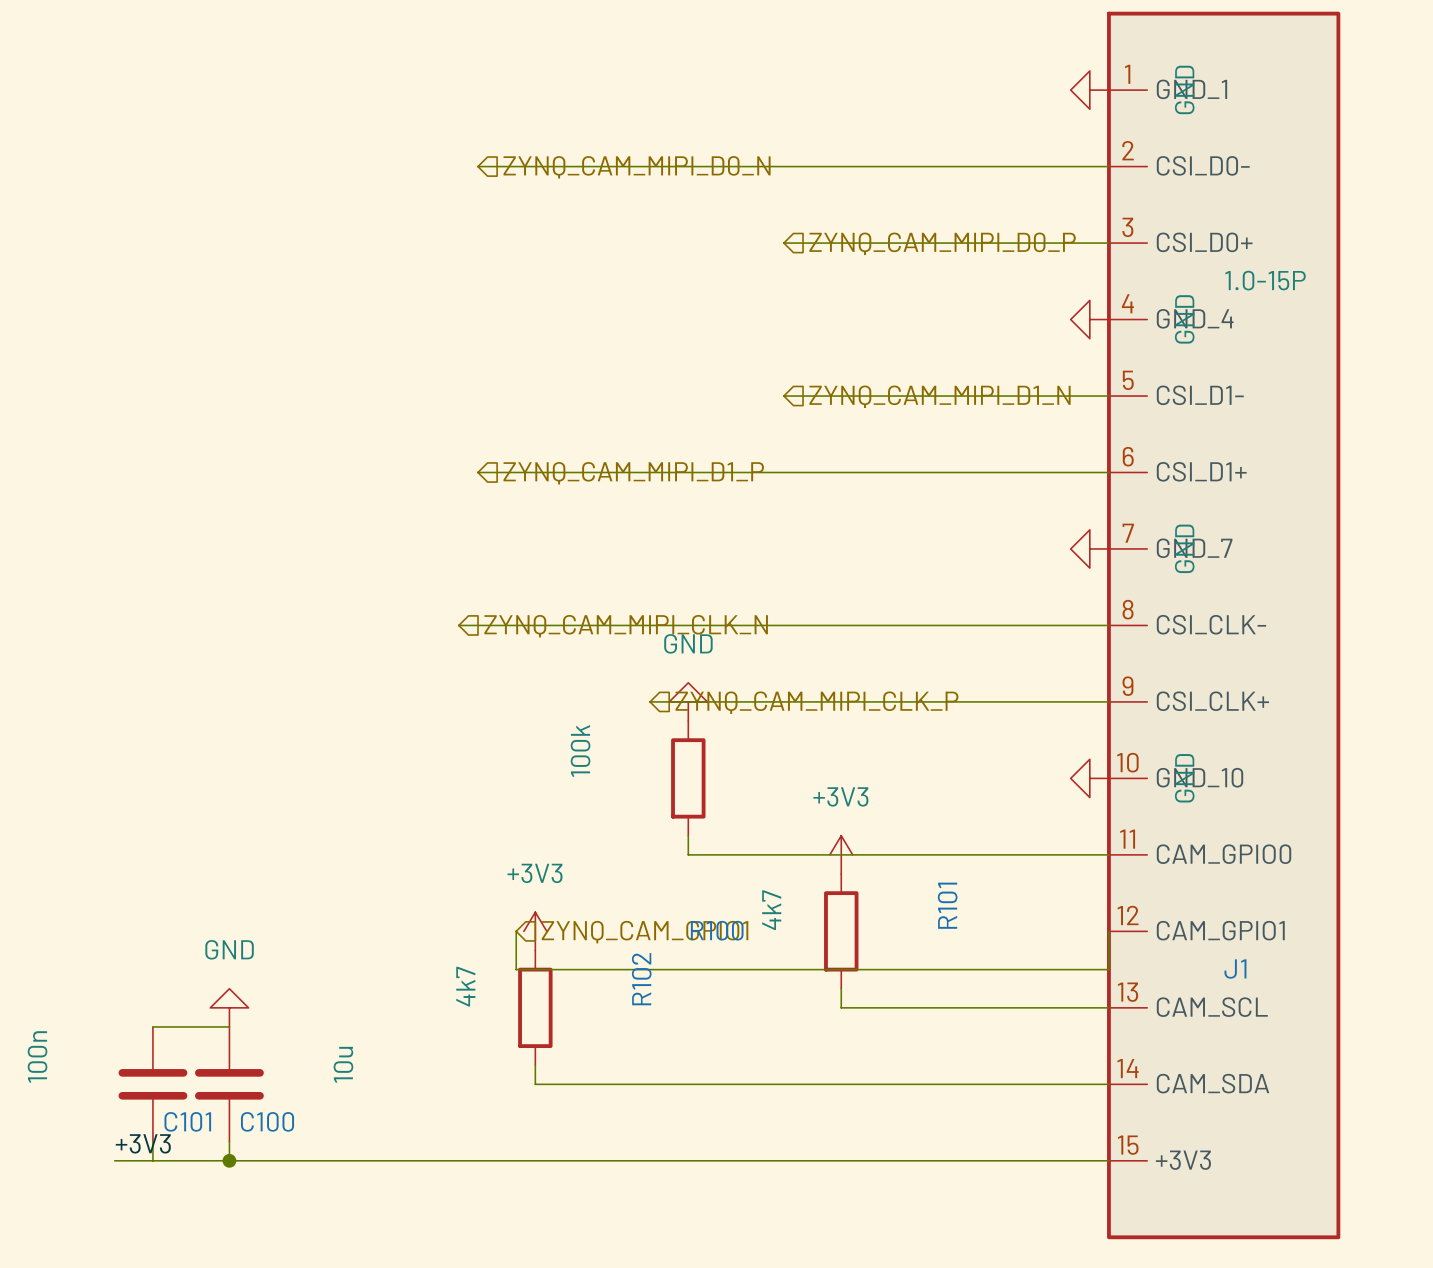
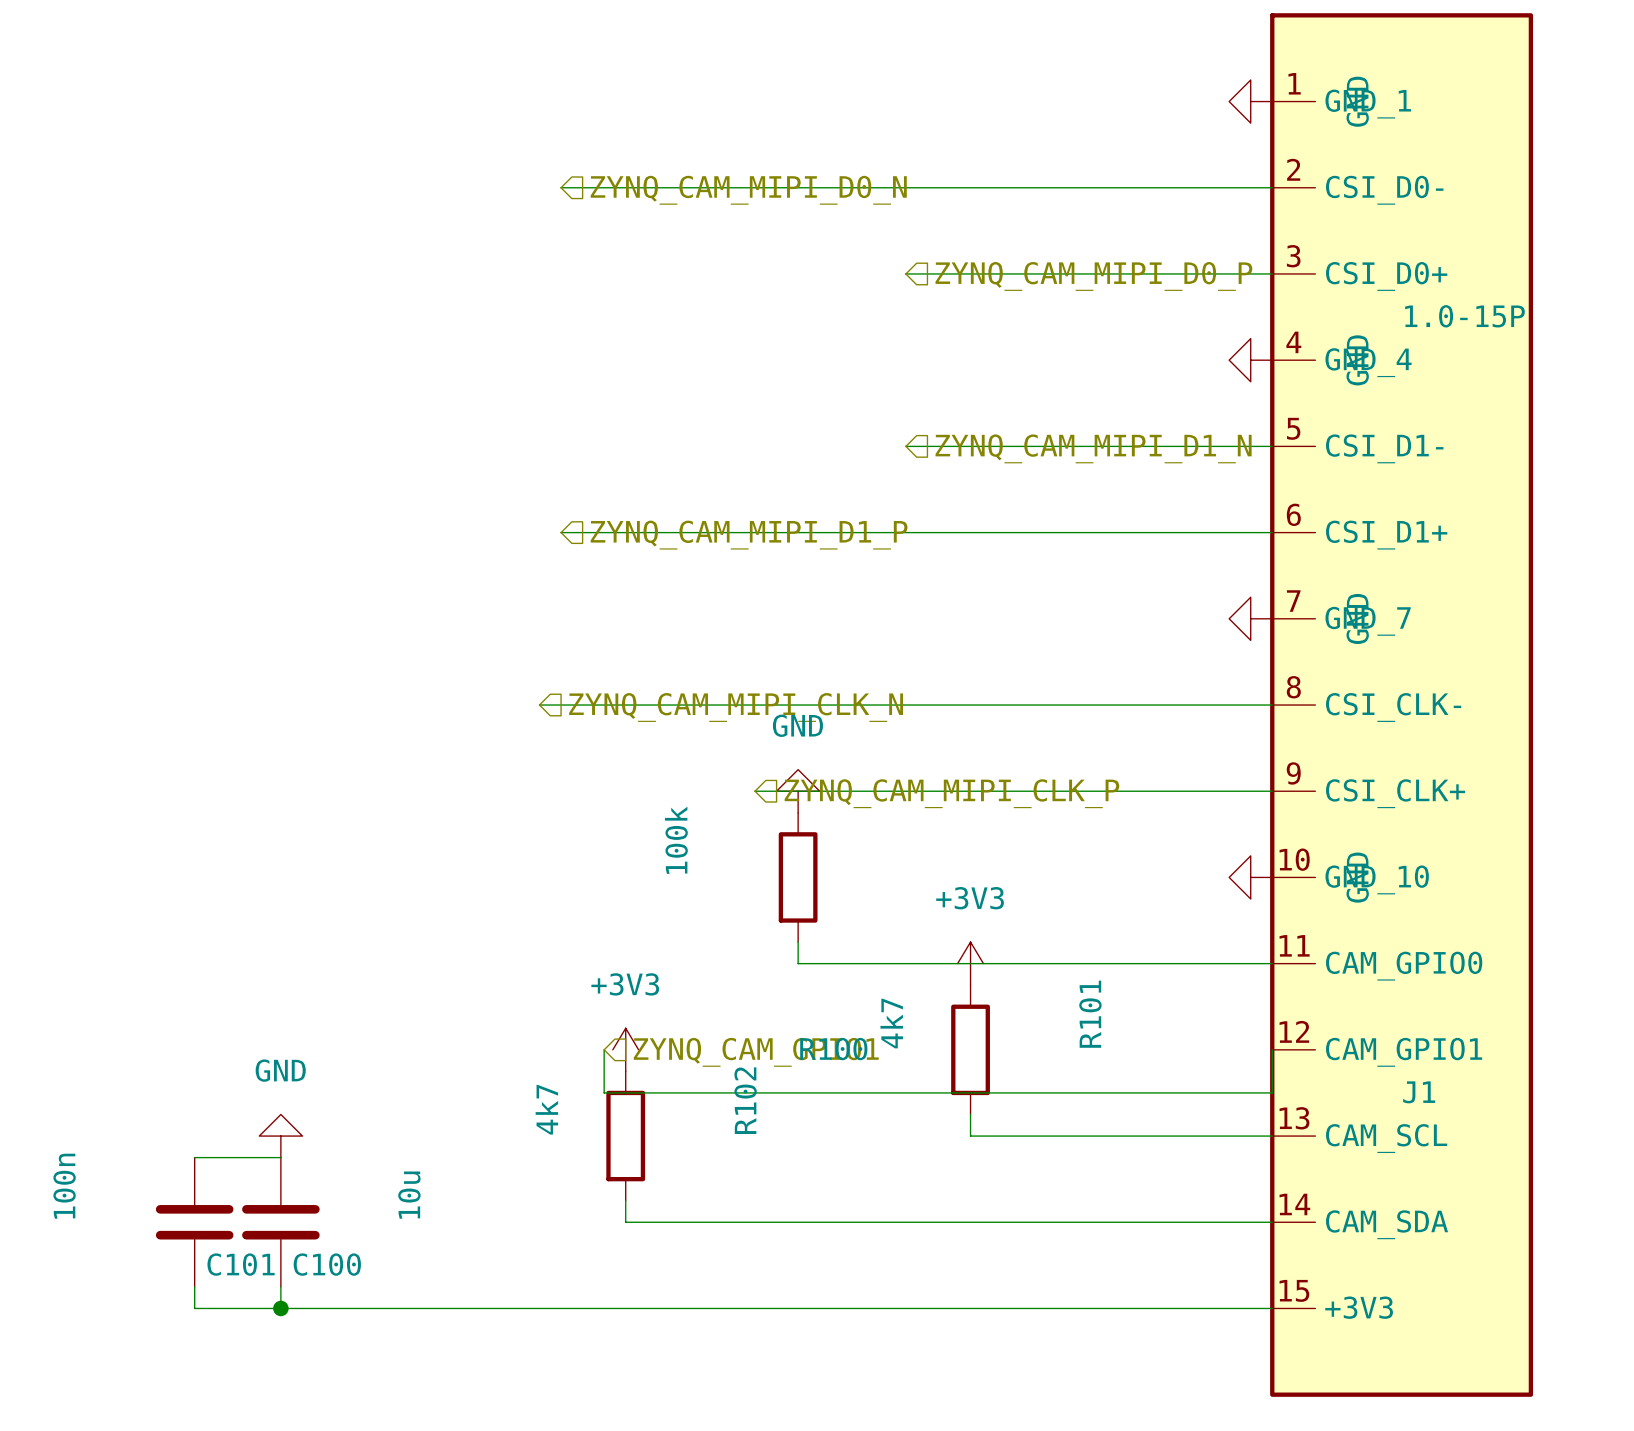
label: +3V3 (143, 1143) -> none
wire: (114, 1160) (152, 1160) -> none

